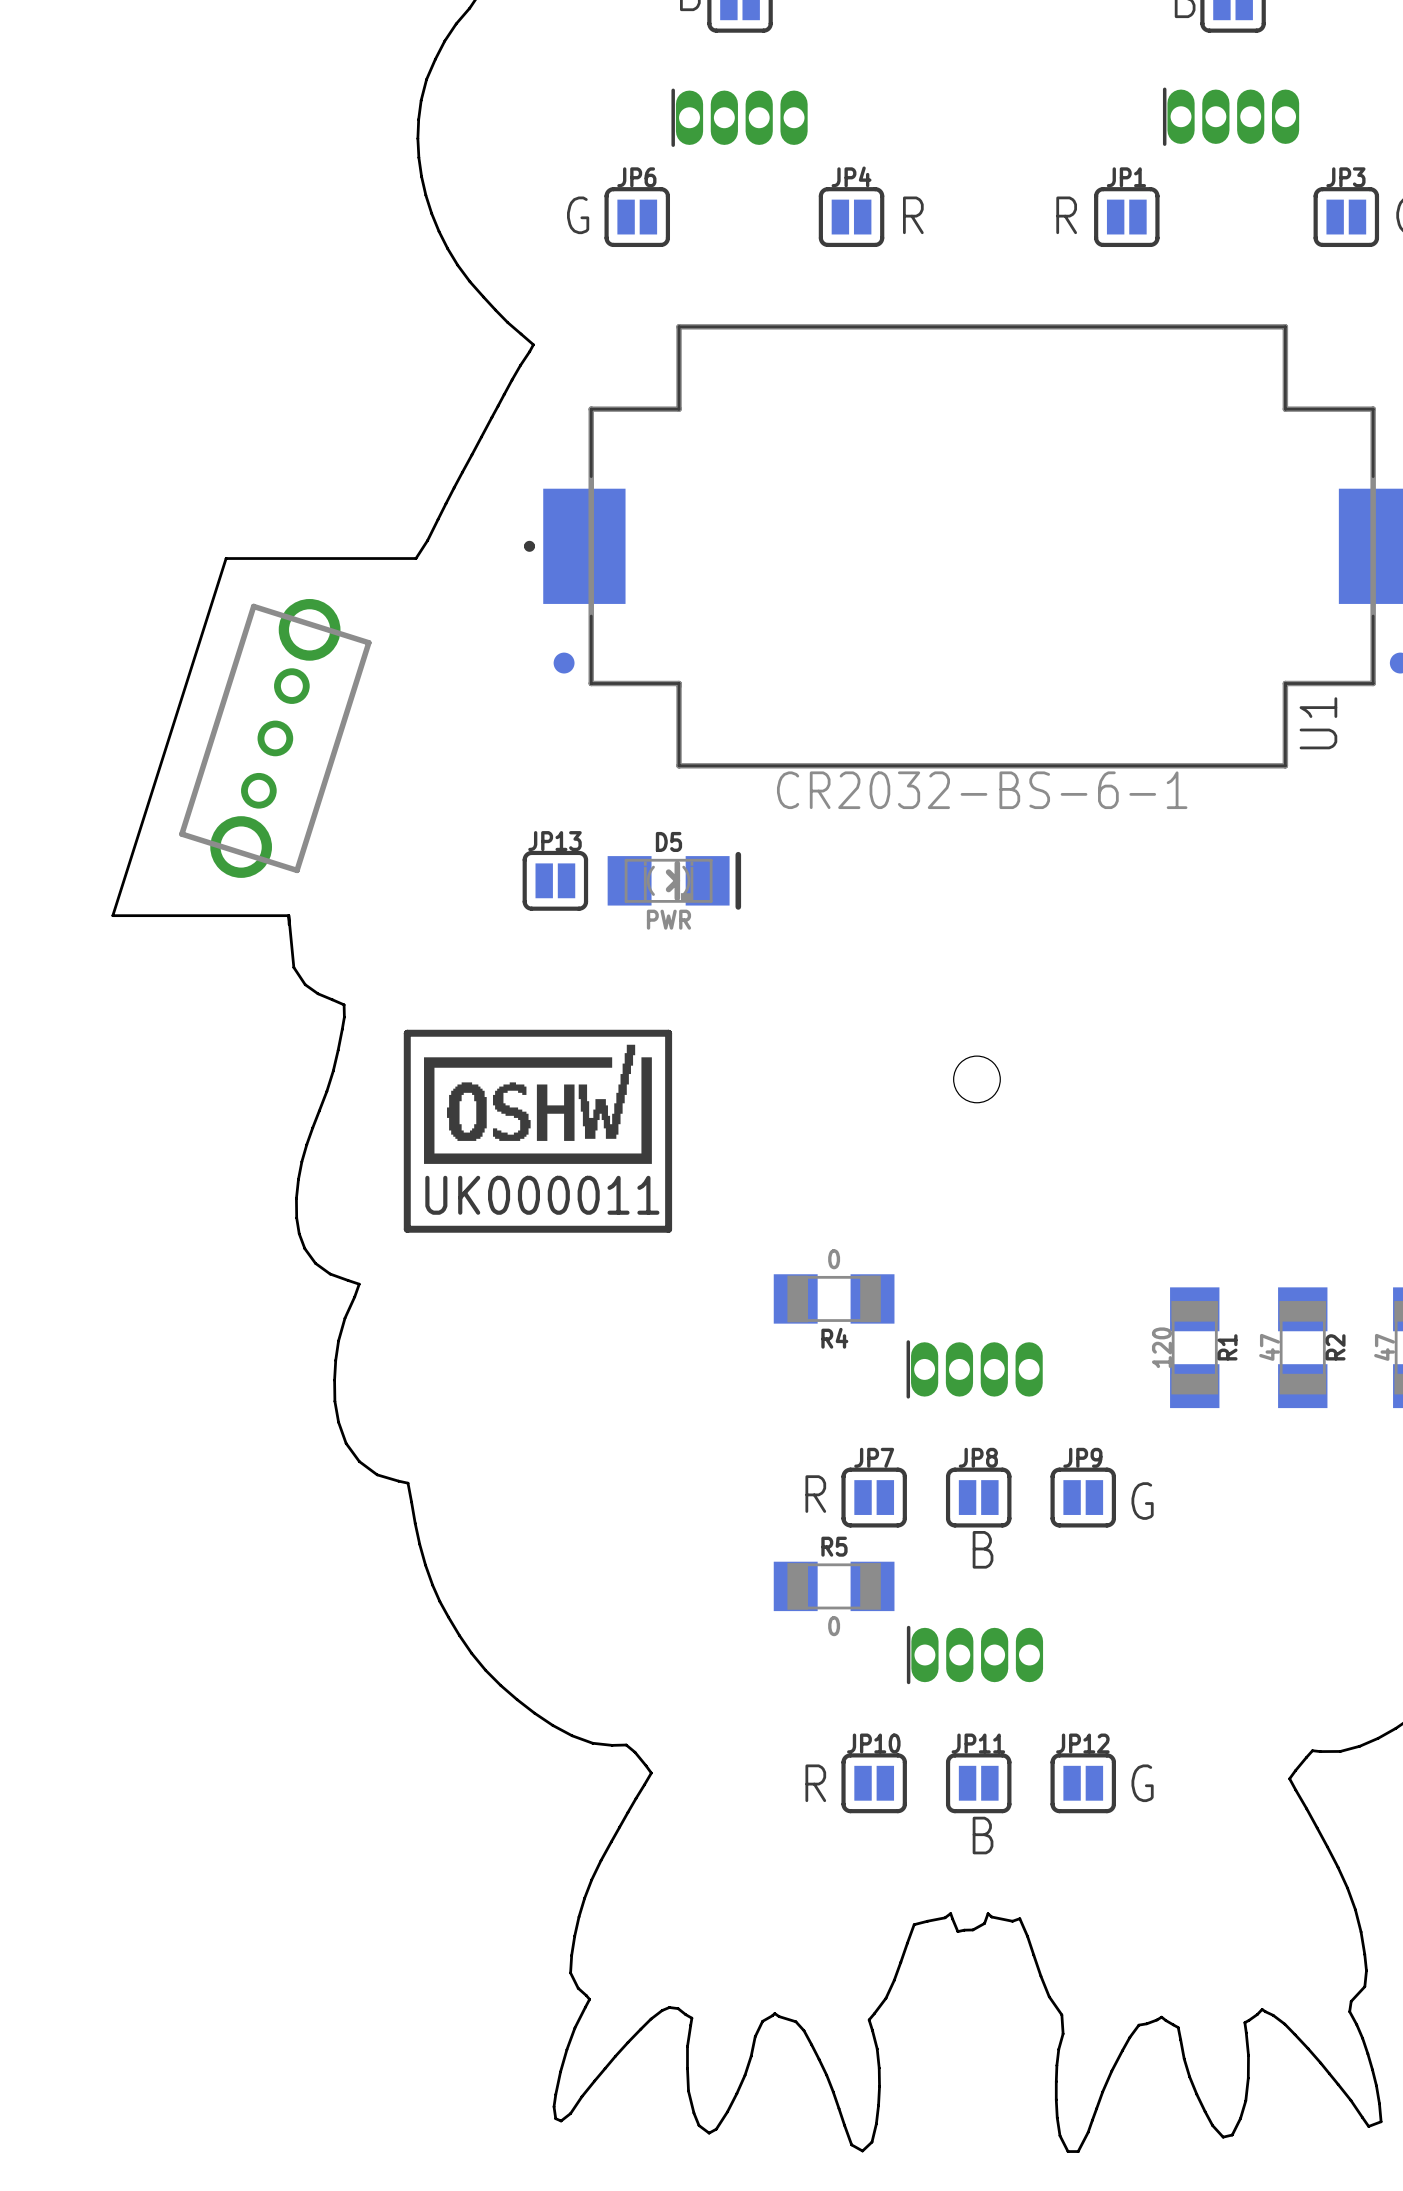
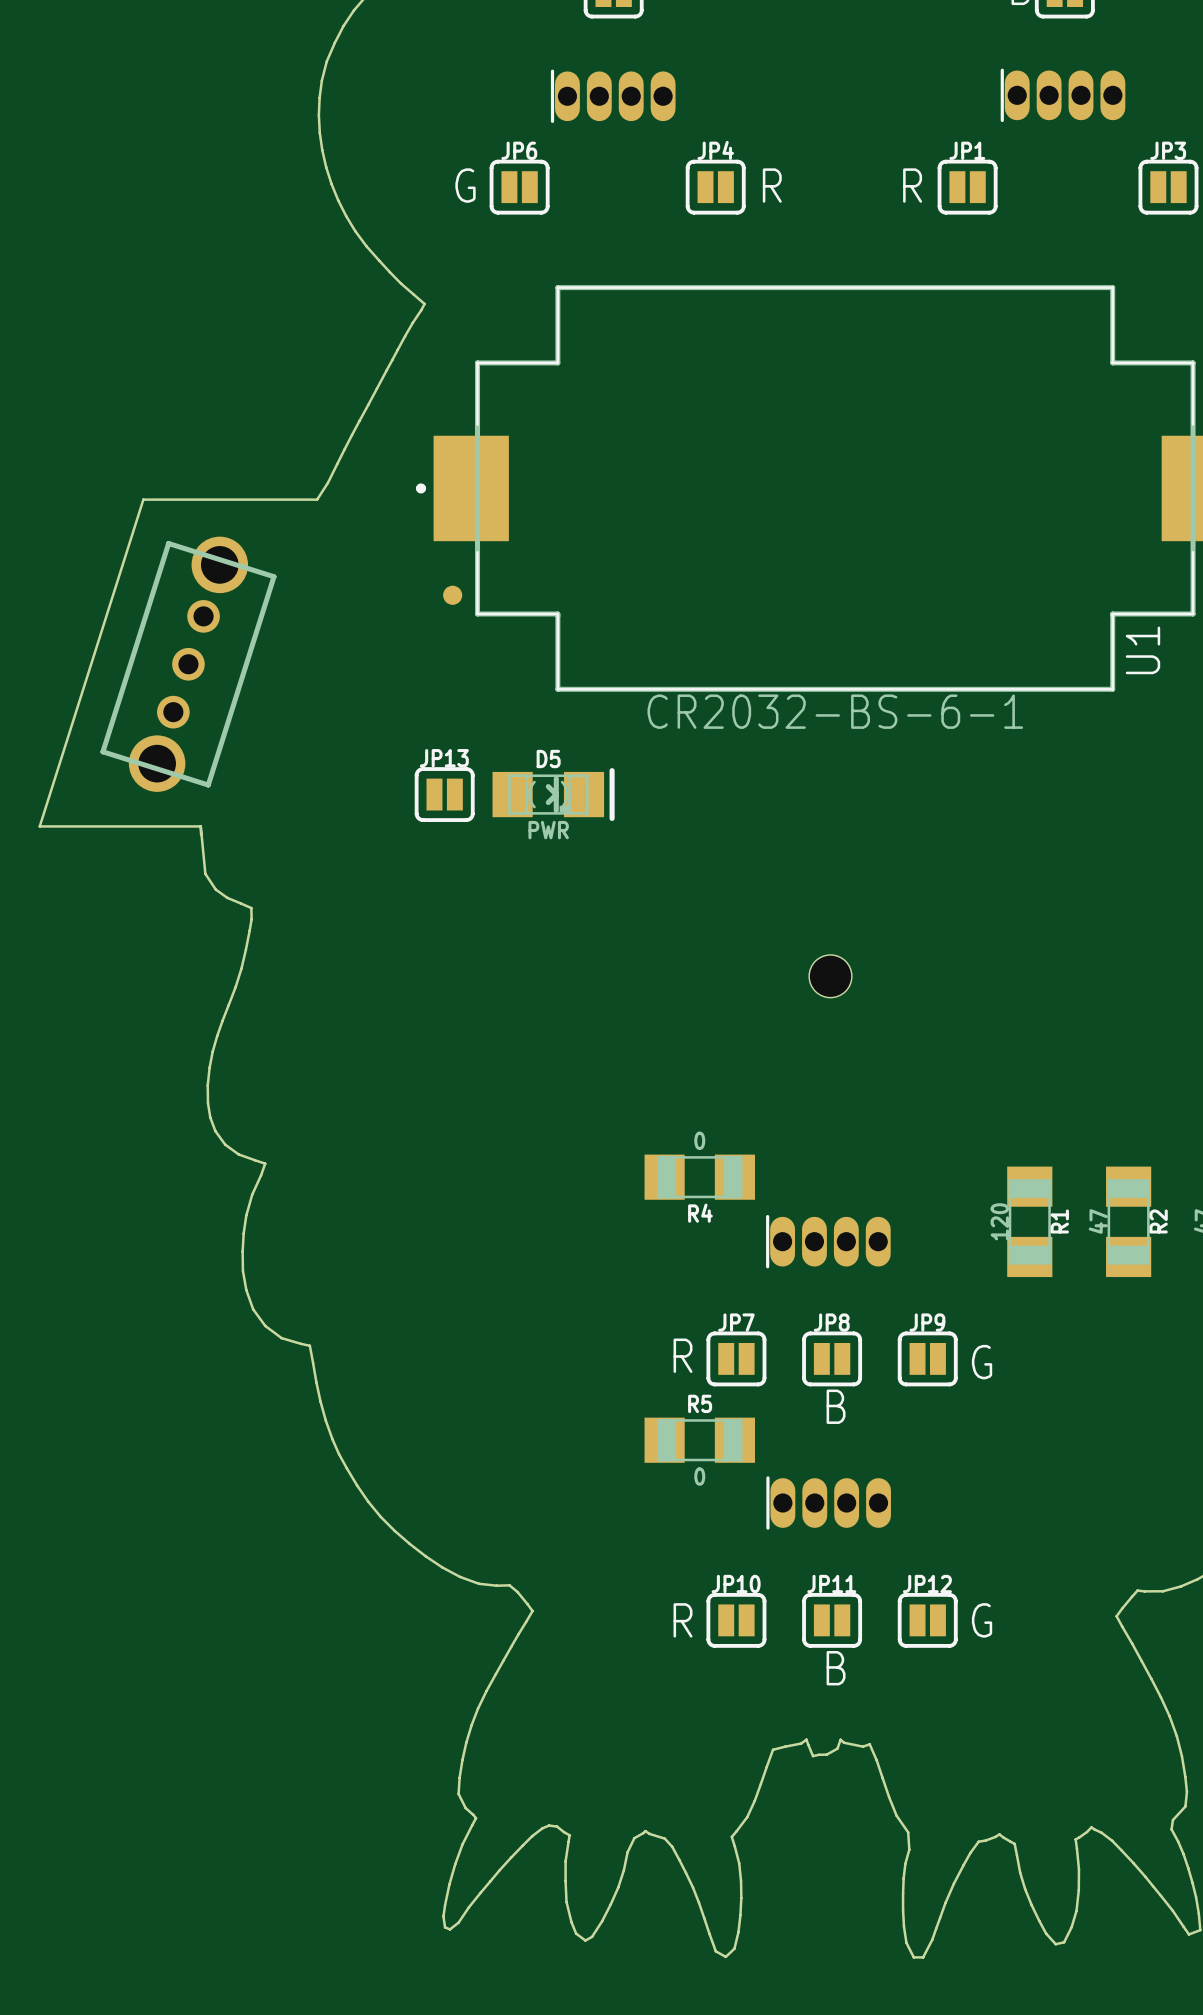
line: (668, 1033) (407, 1033) (407, 1229) (668, 1229) (668, 1033) -> none
drawing: [424, 1044, 652, 1164] -> none

